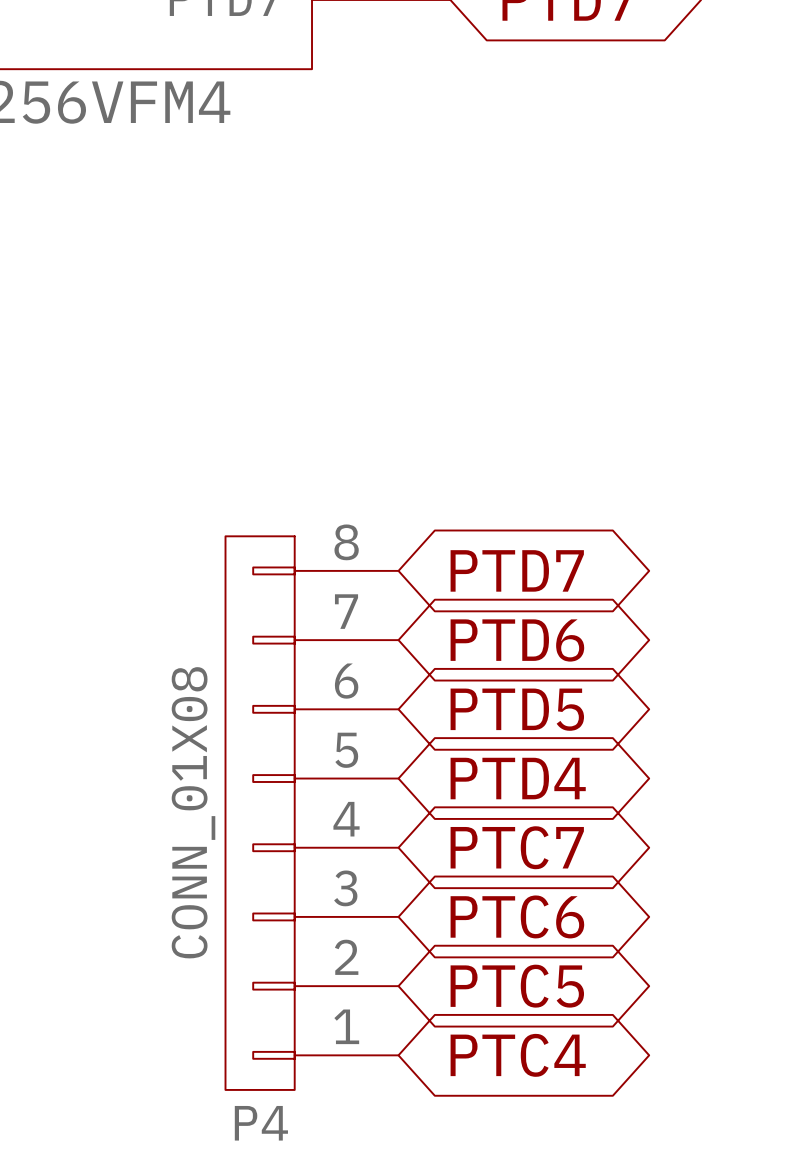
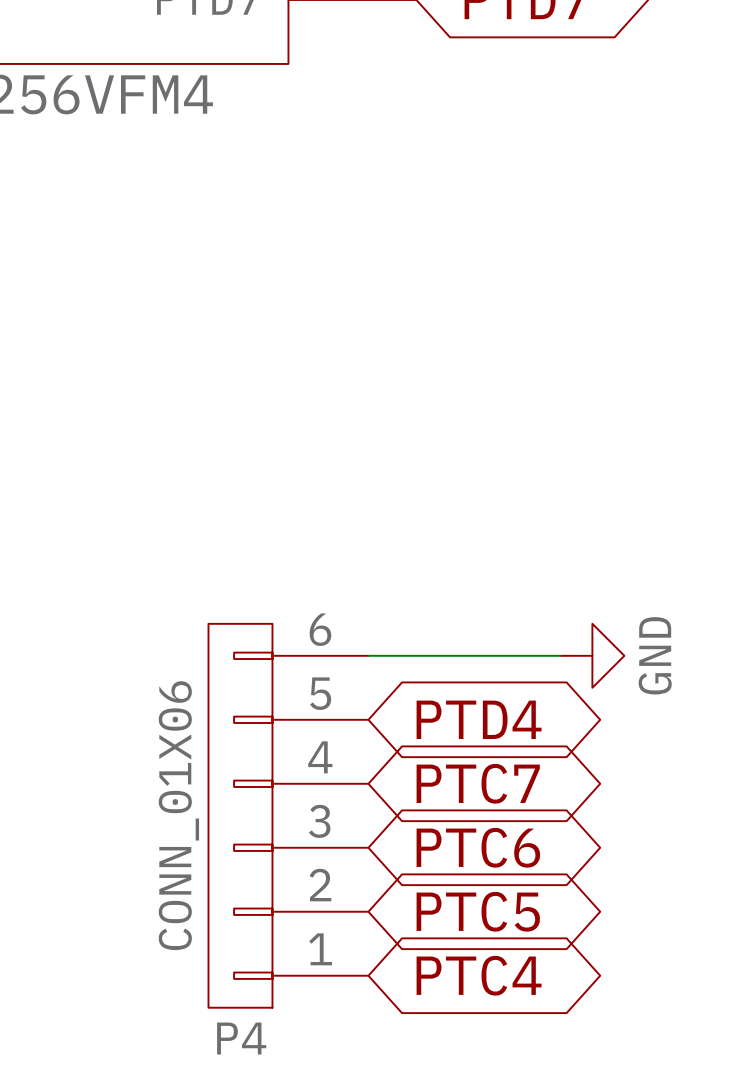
P4 symbol: [225, 536, 399, 1090] -> [208, 623, 369, 1008]
global label: PTD7 (517, 570) -> none
global label: PTD6 (517, 640) -> none
wire: none -> (368, 655) (560, 655)
global label: PTD5 (517, 709) -> none
power symbol: none -> GND (592, 655)
P4 value: CONN_01X08 (193, 812) -> CONN_01X06 (178, 815)

